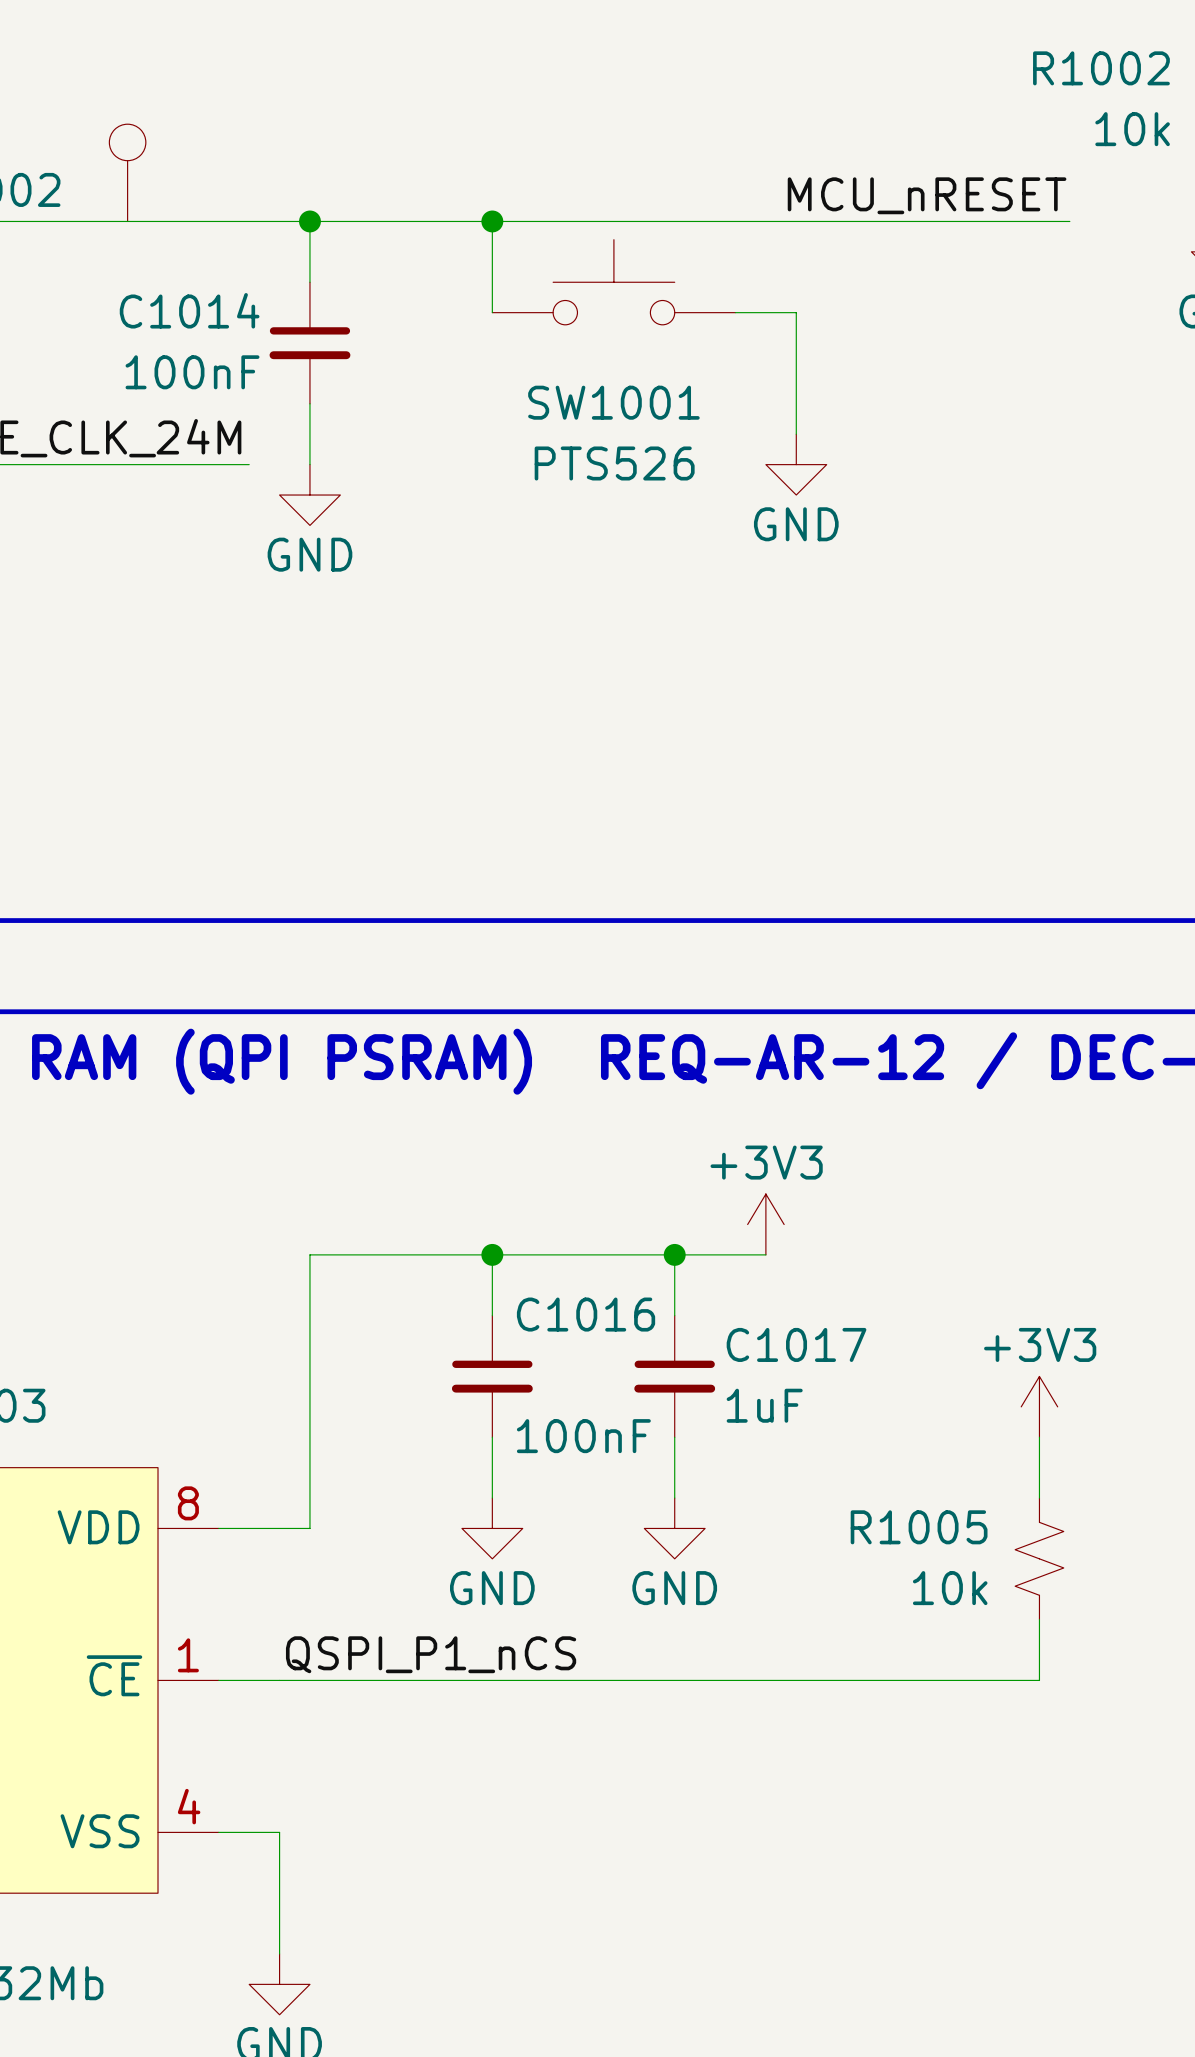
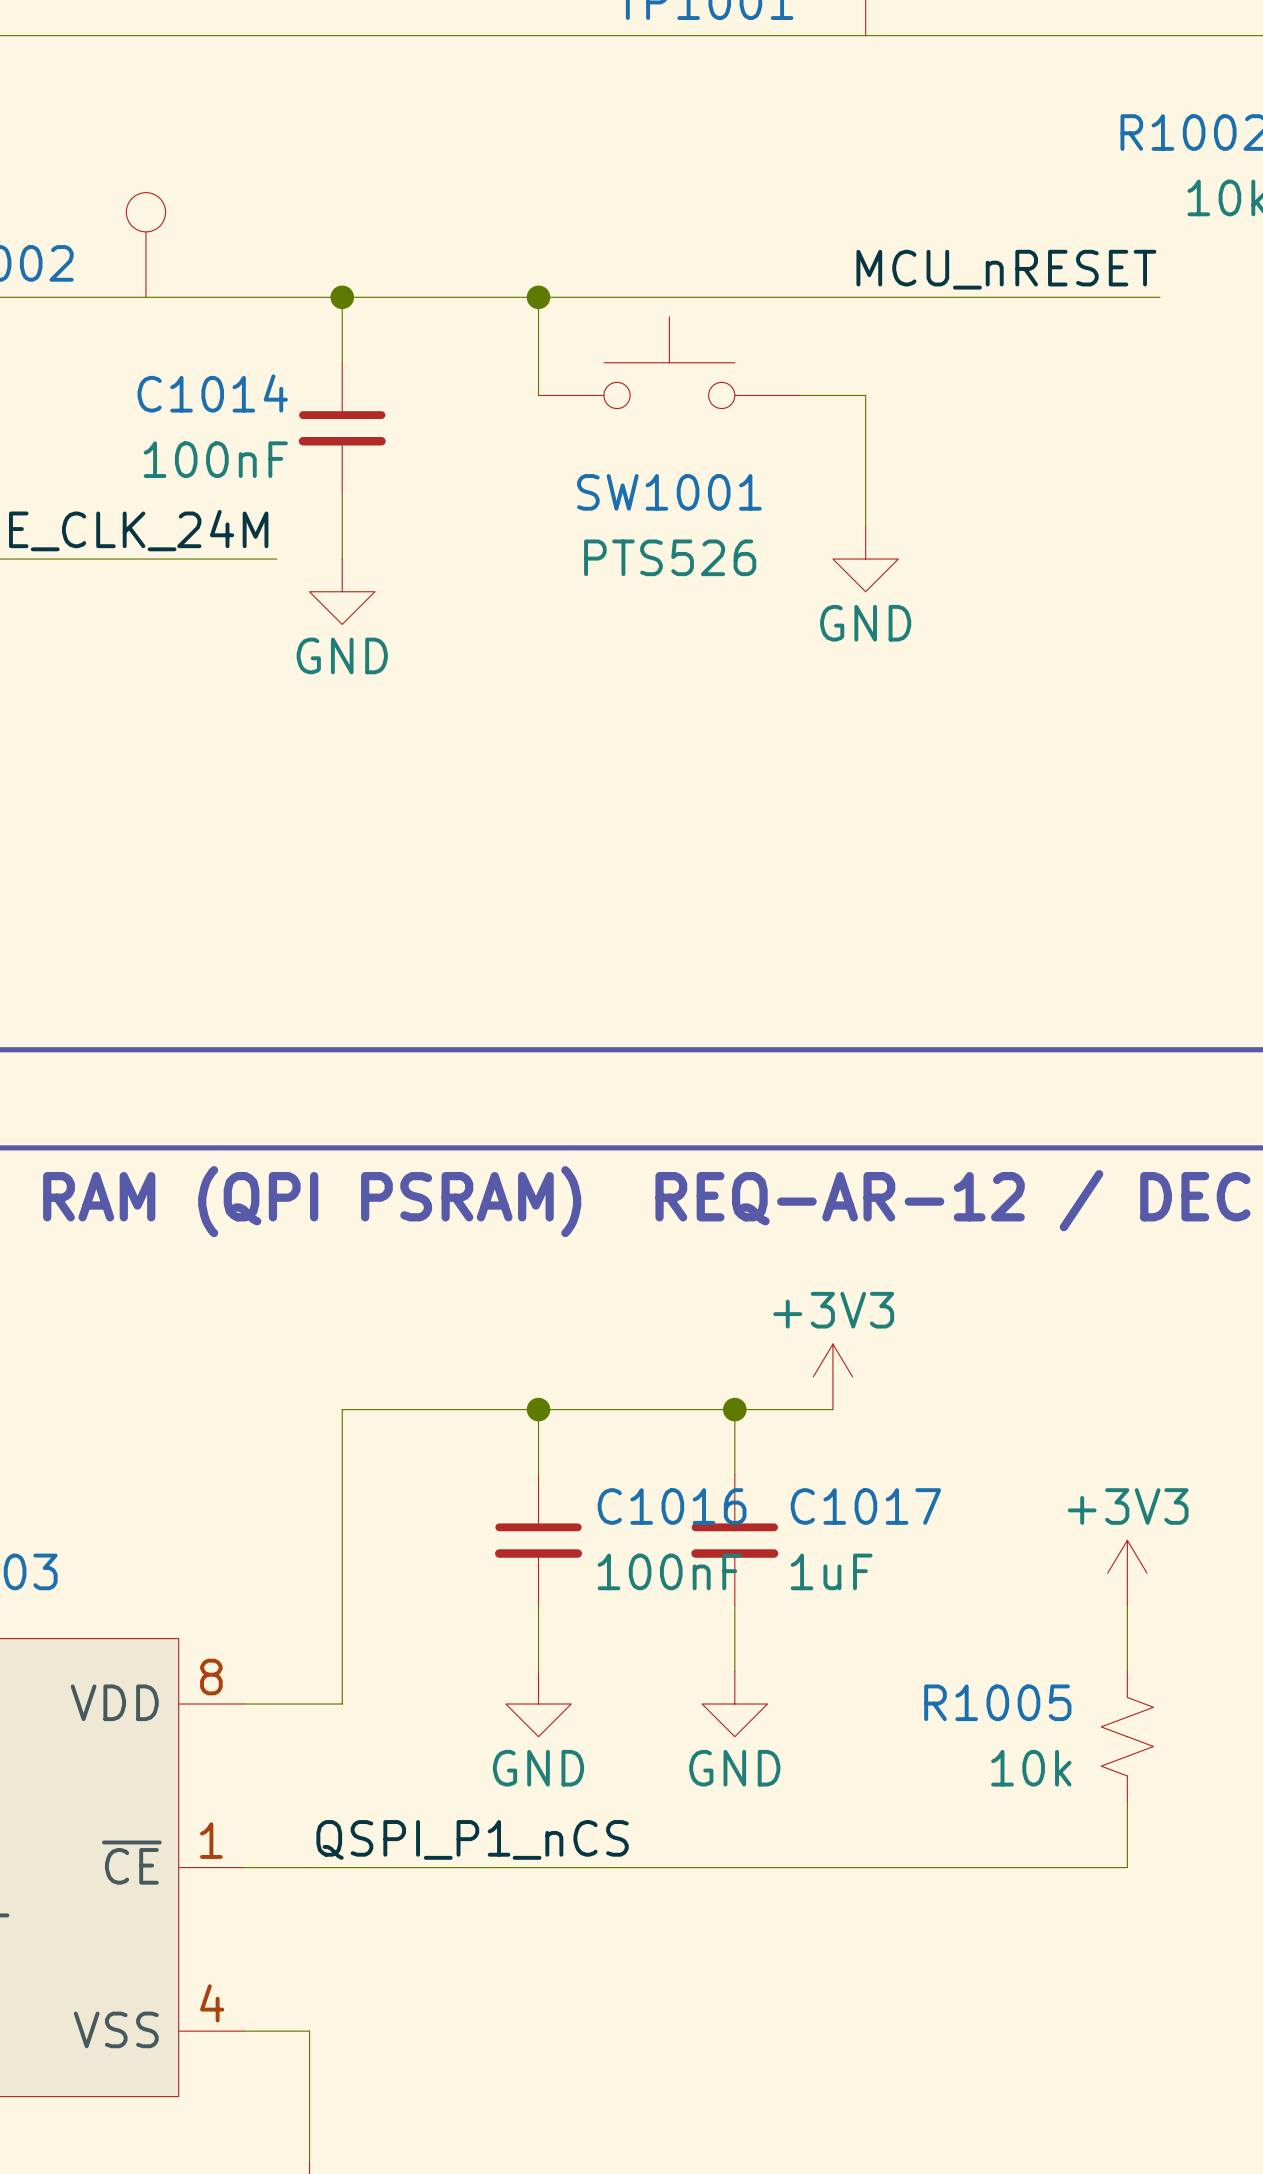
C1016 name position: C1016 (586, 1314) -> C1016 (672, 1506)
C1016 value position: 100nF (583, 1436) -> 100nF (669, 1571)

